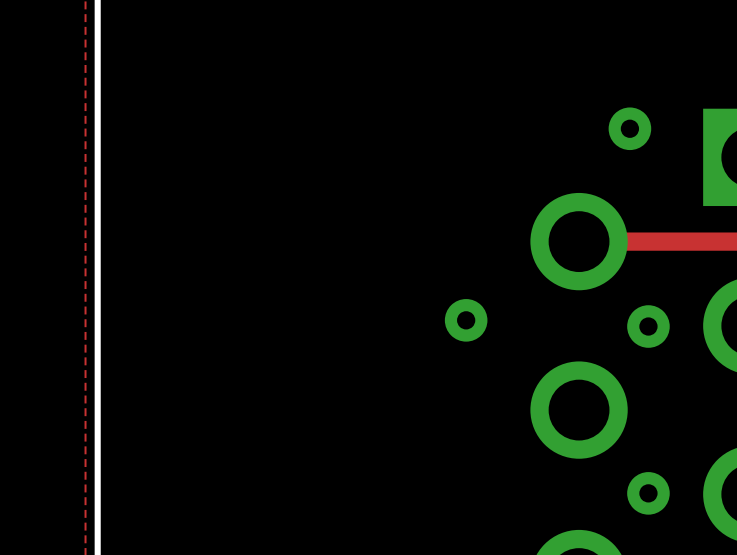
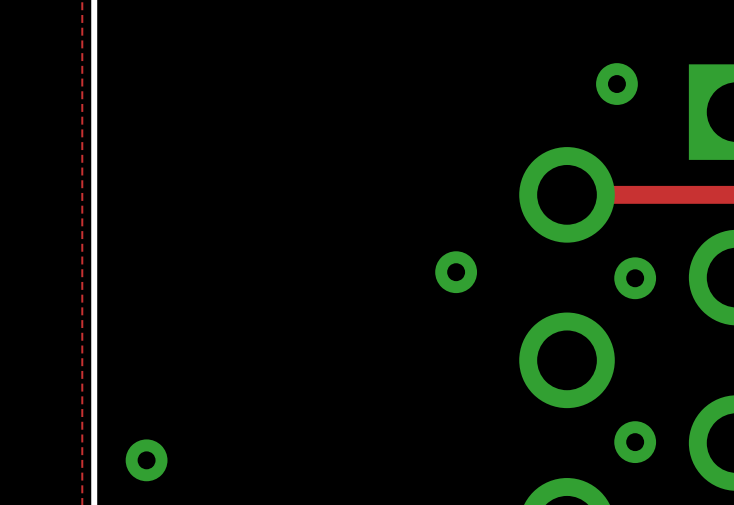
via: none -> (146, 460)

